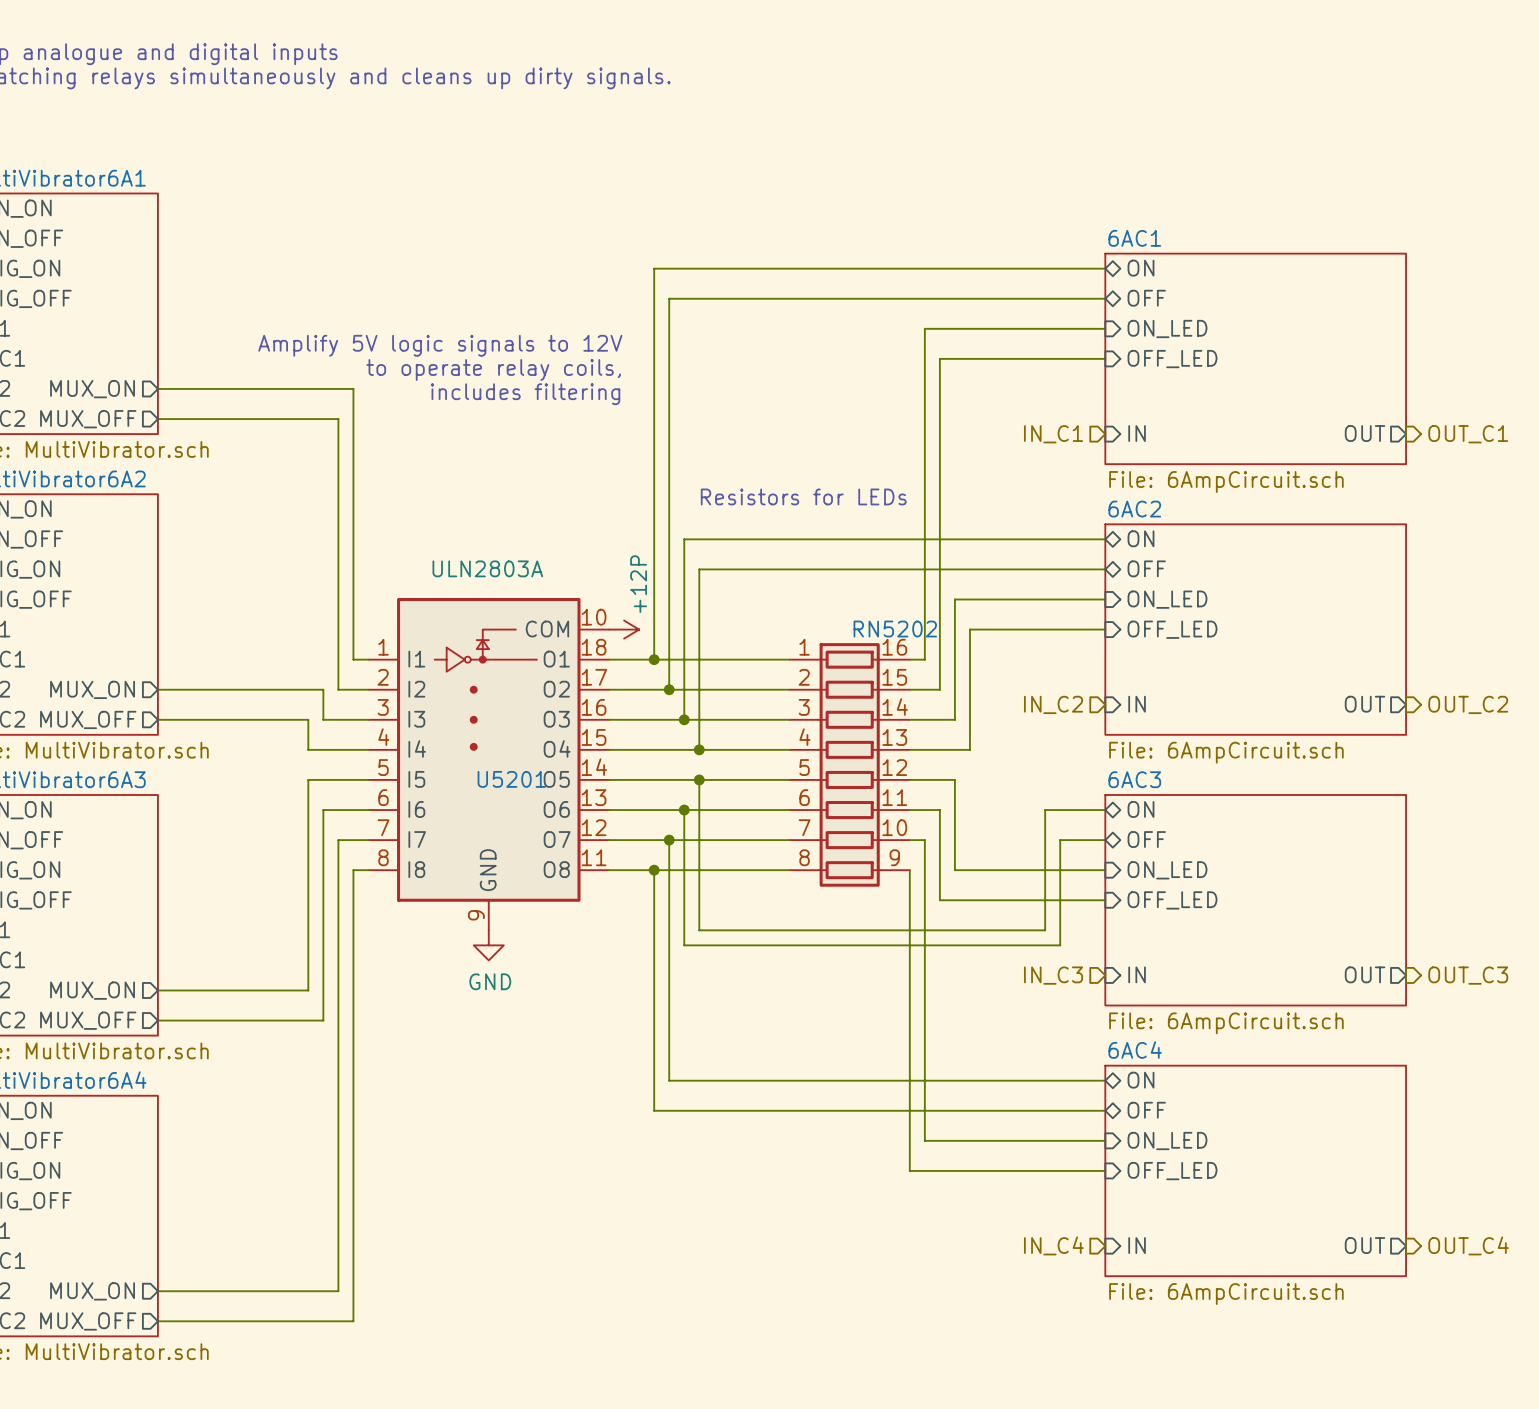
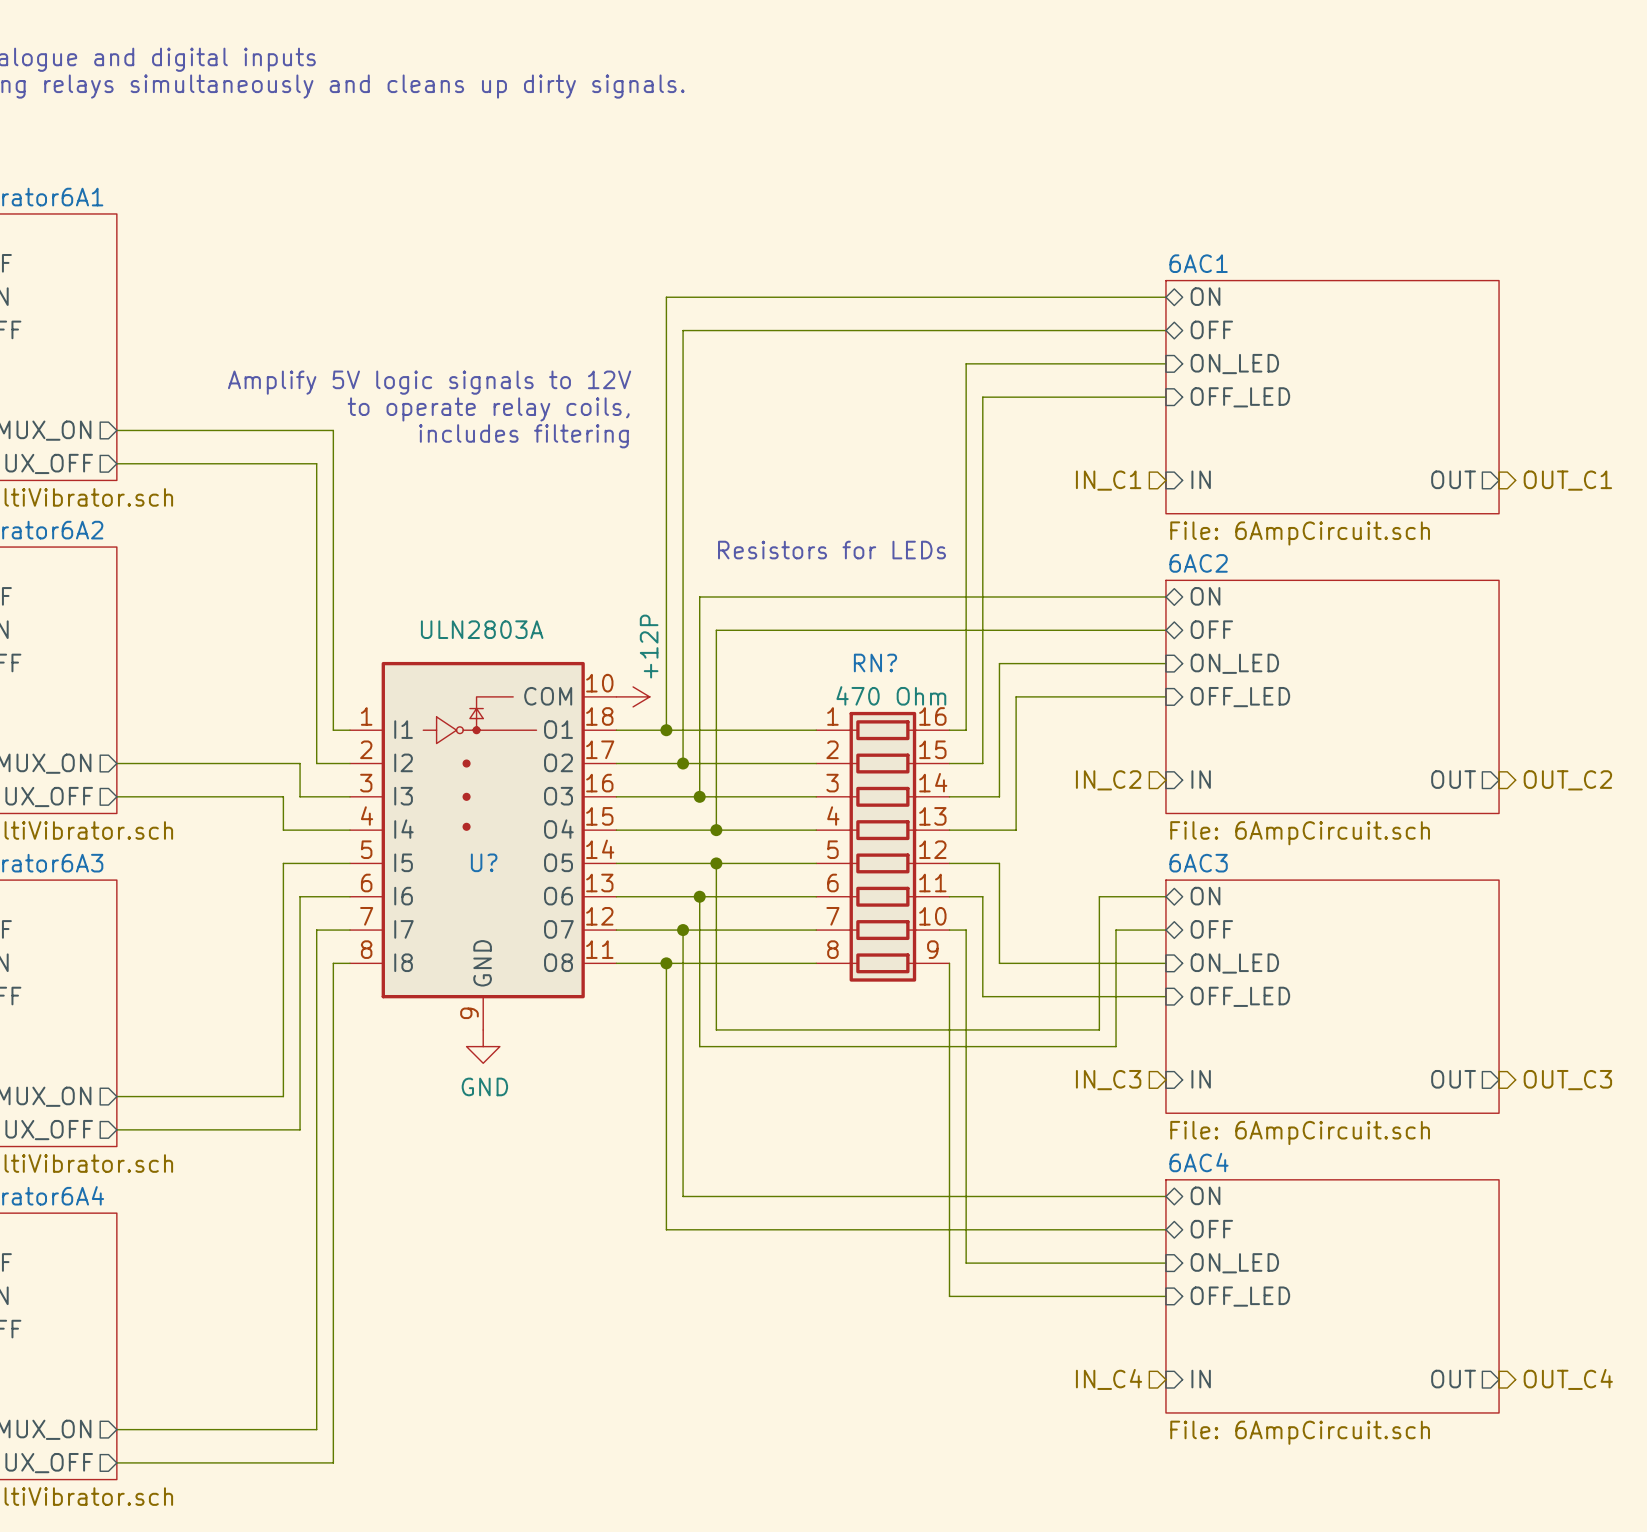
RN5202 value: none -> 470 Ohm (891, 695)
RN5202 name: RN5202 (895, 629) -> RN? (875, 662)
U5201 name: U5201 (511, 779) -> U? (484, 862)

